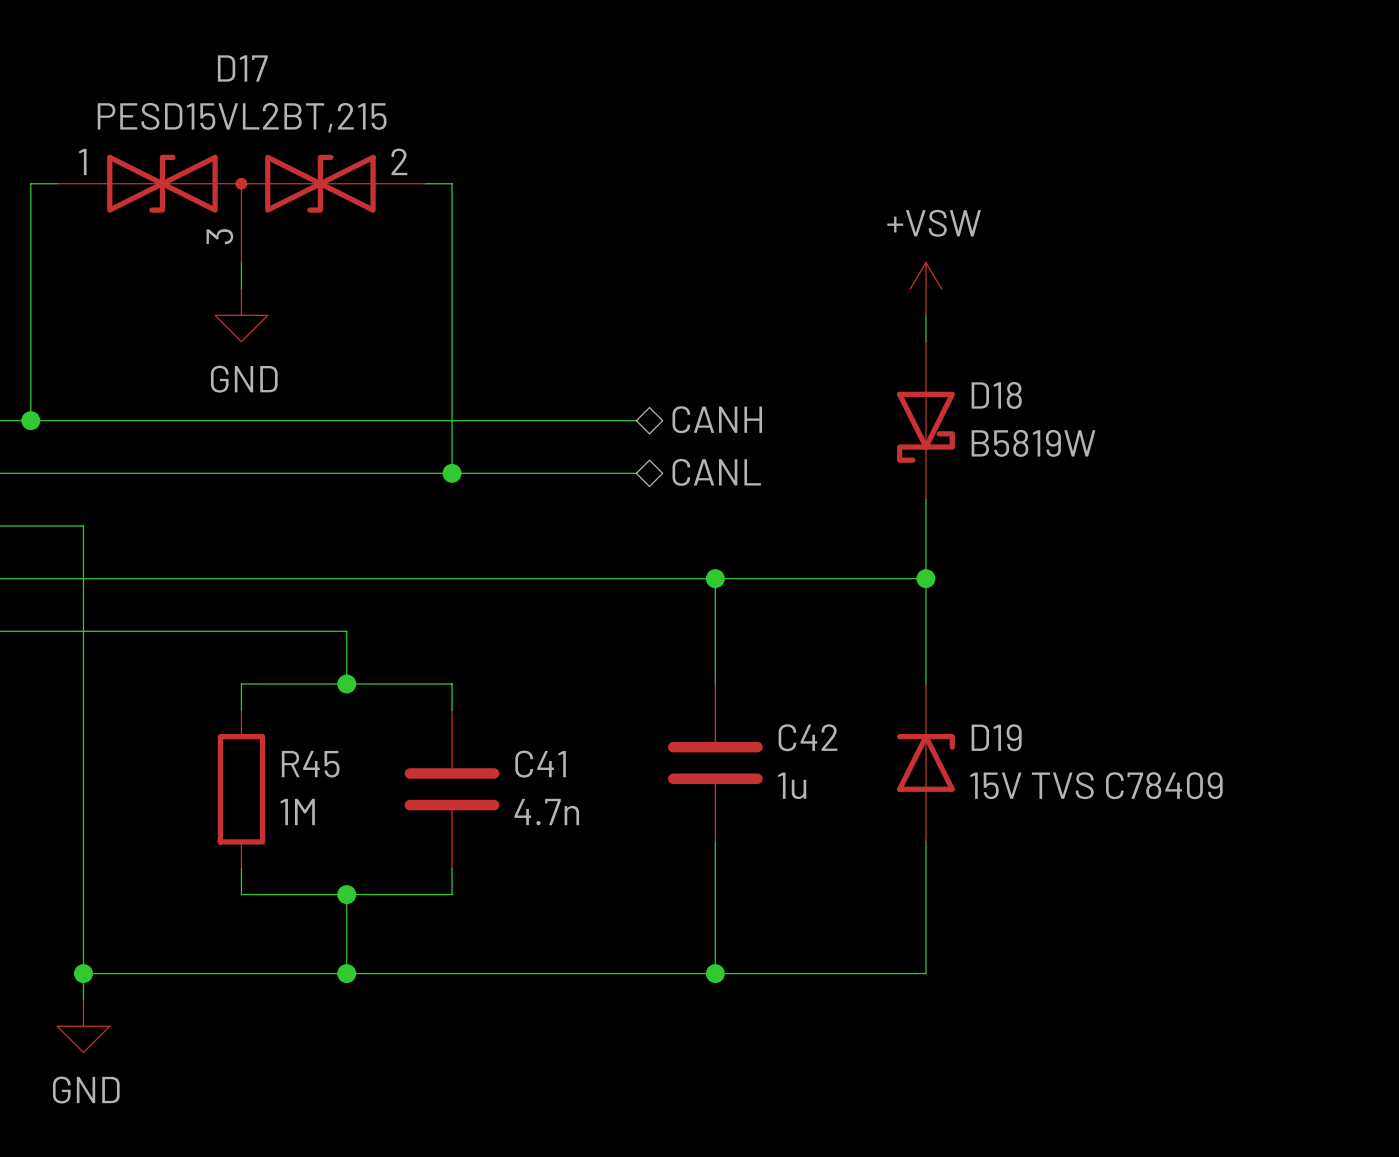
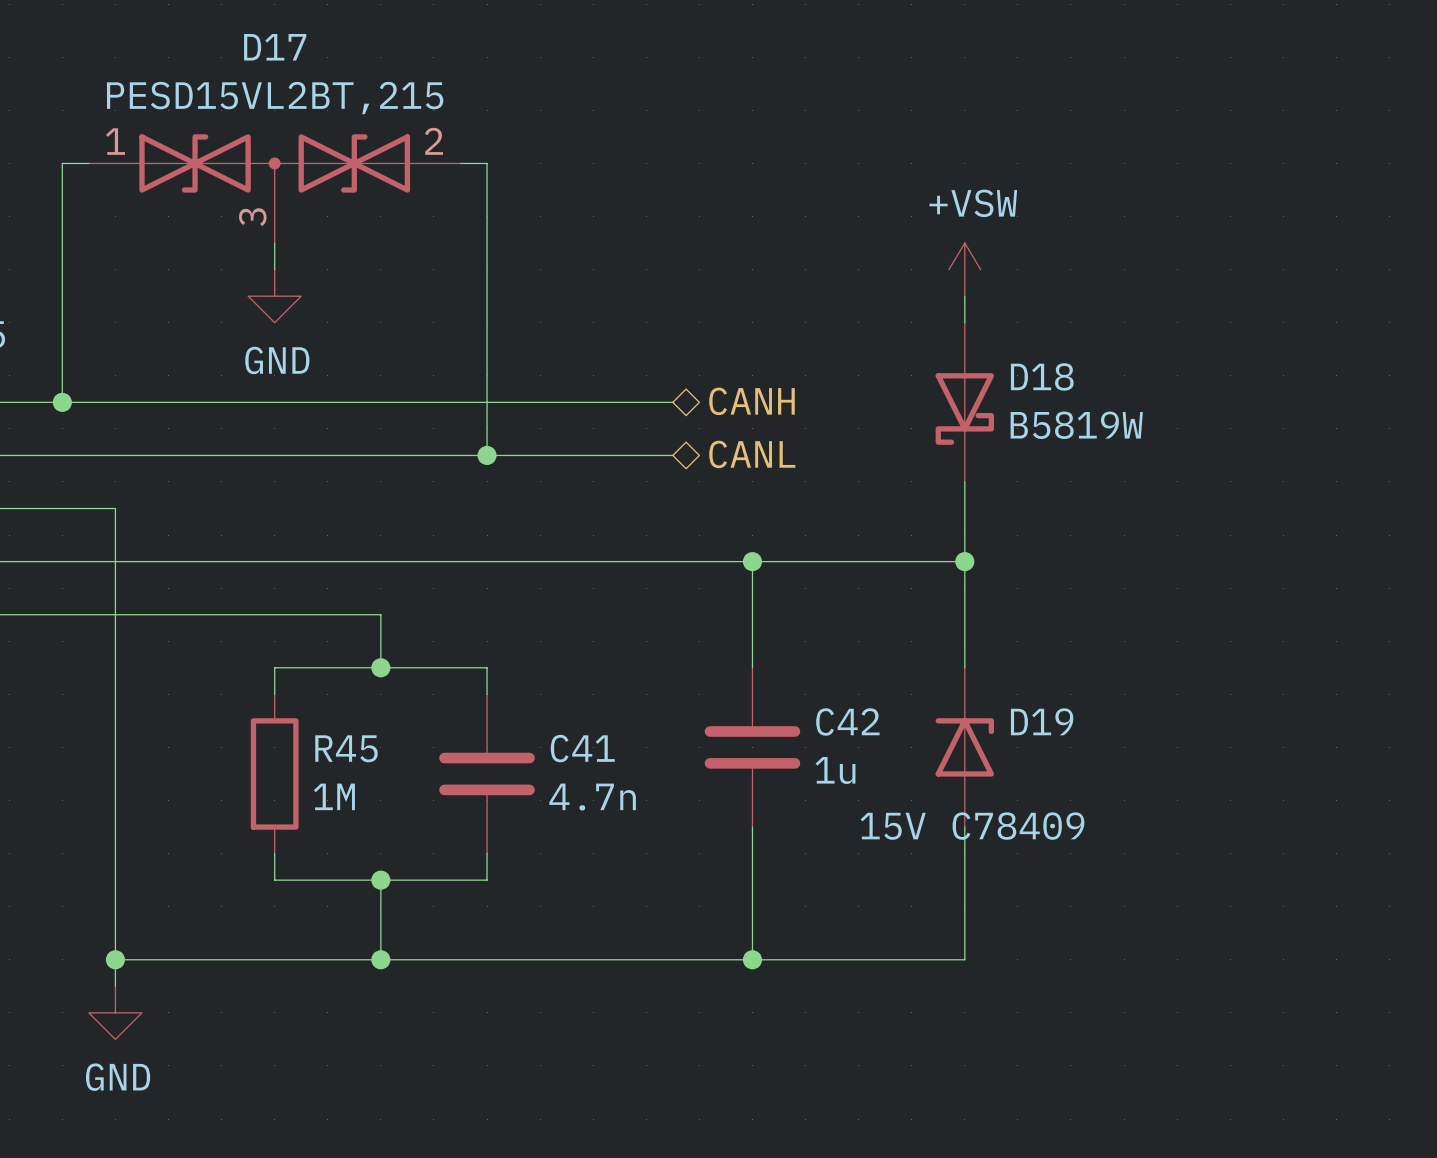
D19 value: 15V TVS C78409 (1096, 785) -> 15V C78409 (972, 826)

